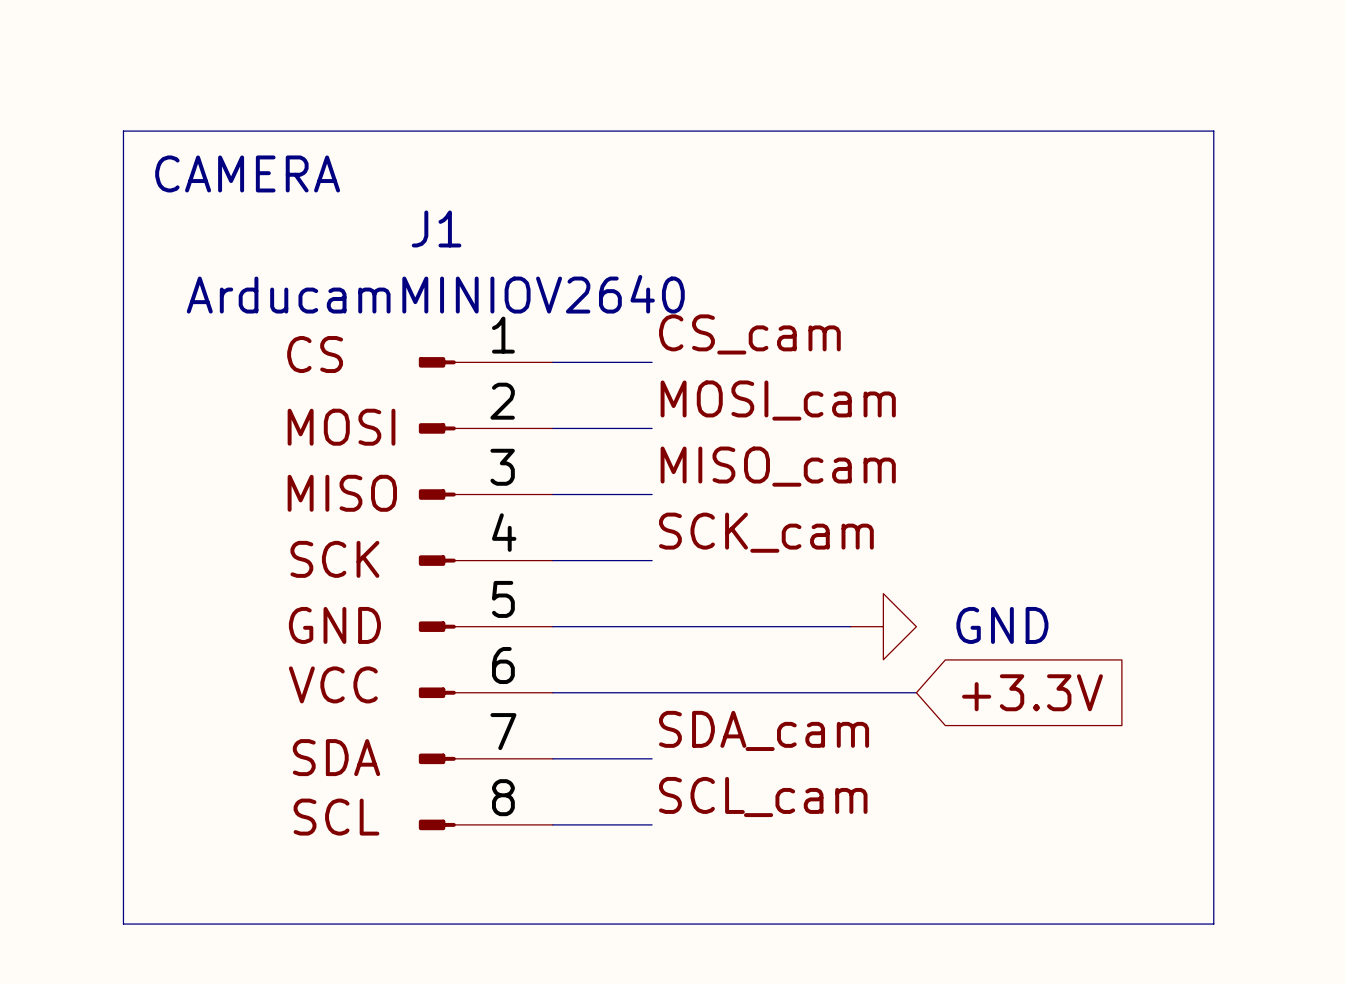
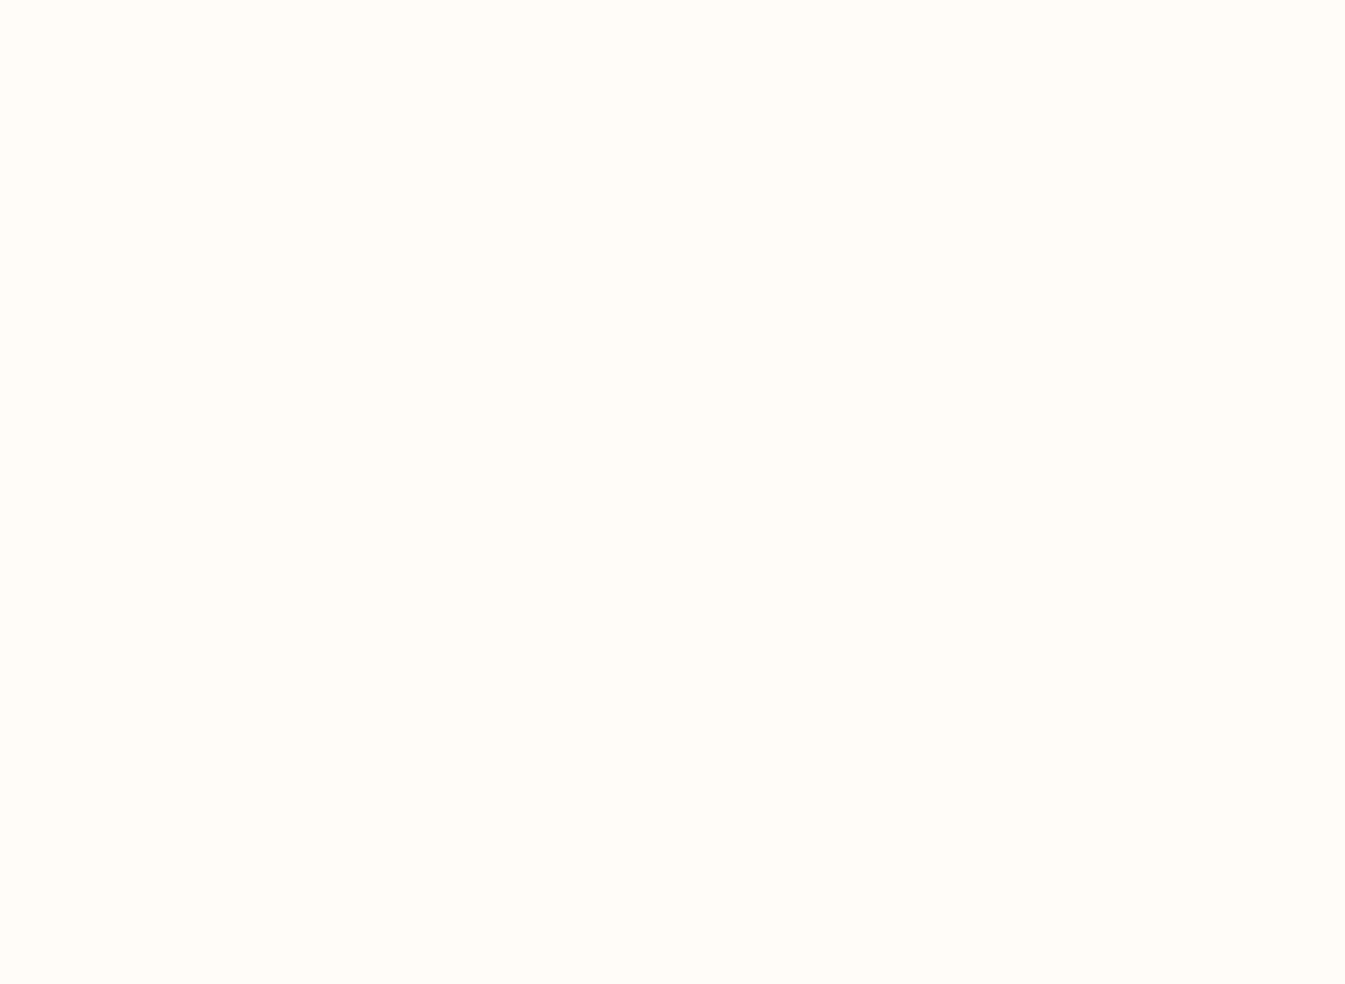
line: (123, 131) (1213, 131) (1213, 924) (123, 924) (123, 131) -> none
text: CAMERA (247, 173) -> none
label: CS_cam (749, 334) -> none
wire: (552, 362) (652, 362) -> none
label: MOSI_cam (778, 400) -> none
wire: (552, 428) (652, 428) -> none
label: MISO_cam (778, 466) -> none
wire: (552, 494) (652, 494) -> none
label: SCK_cam (766, 532) -> none
wire: (552, 560) (652, 560) -> none
J1: ArducamMINIOV2640 (485, 593) -> none
wire: (552, 626) (850, 626) -> none
power symbol: GND (883, 626) -> none
wire: (552, 692) (916, 692) -> none
global label: +3.3V (1032, 692) -> none
label: SDA_cam (764, 730) -> none
wire: (552, 758) (652, 758) -> none
label: SCL_cam (763, 797) -> none
wire: (552, 824) (652, 824) -> none

